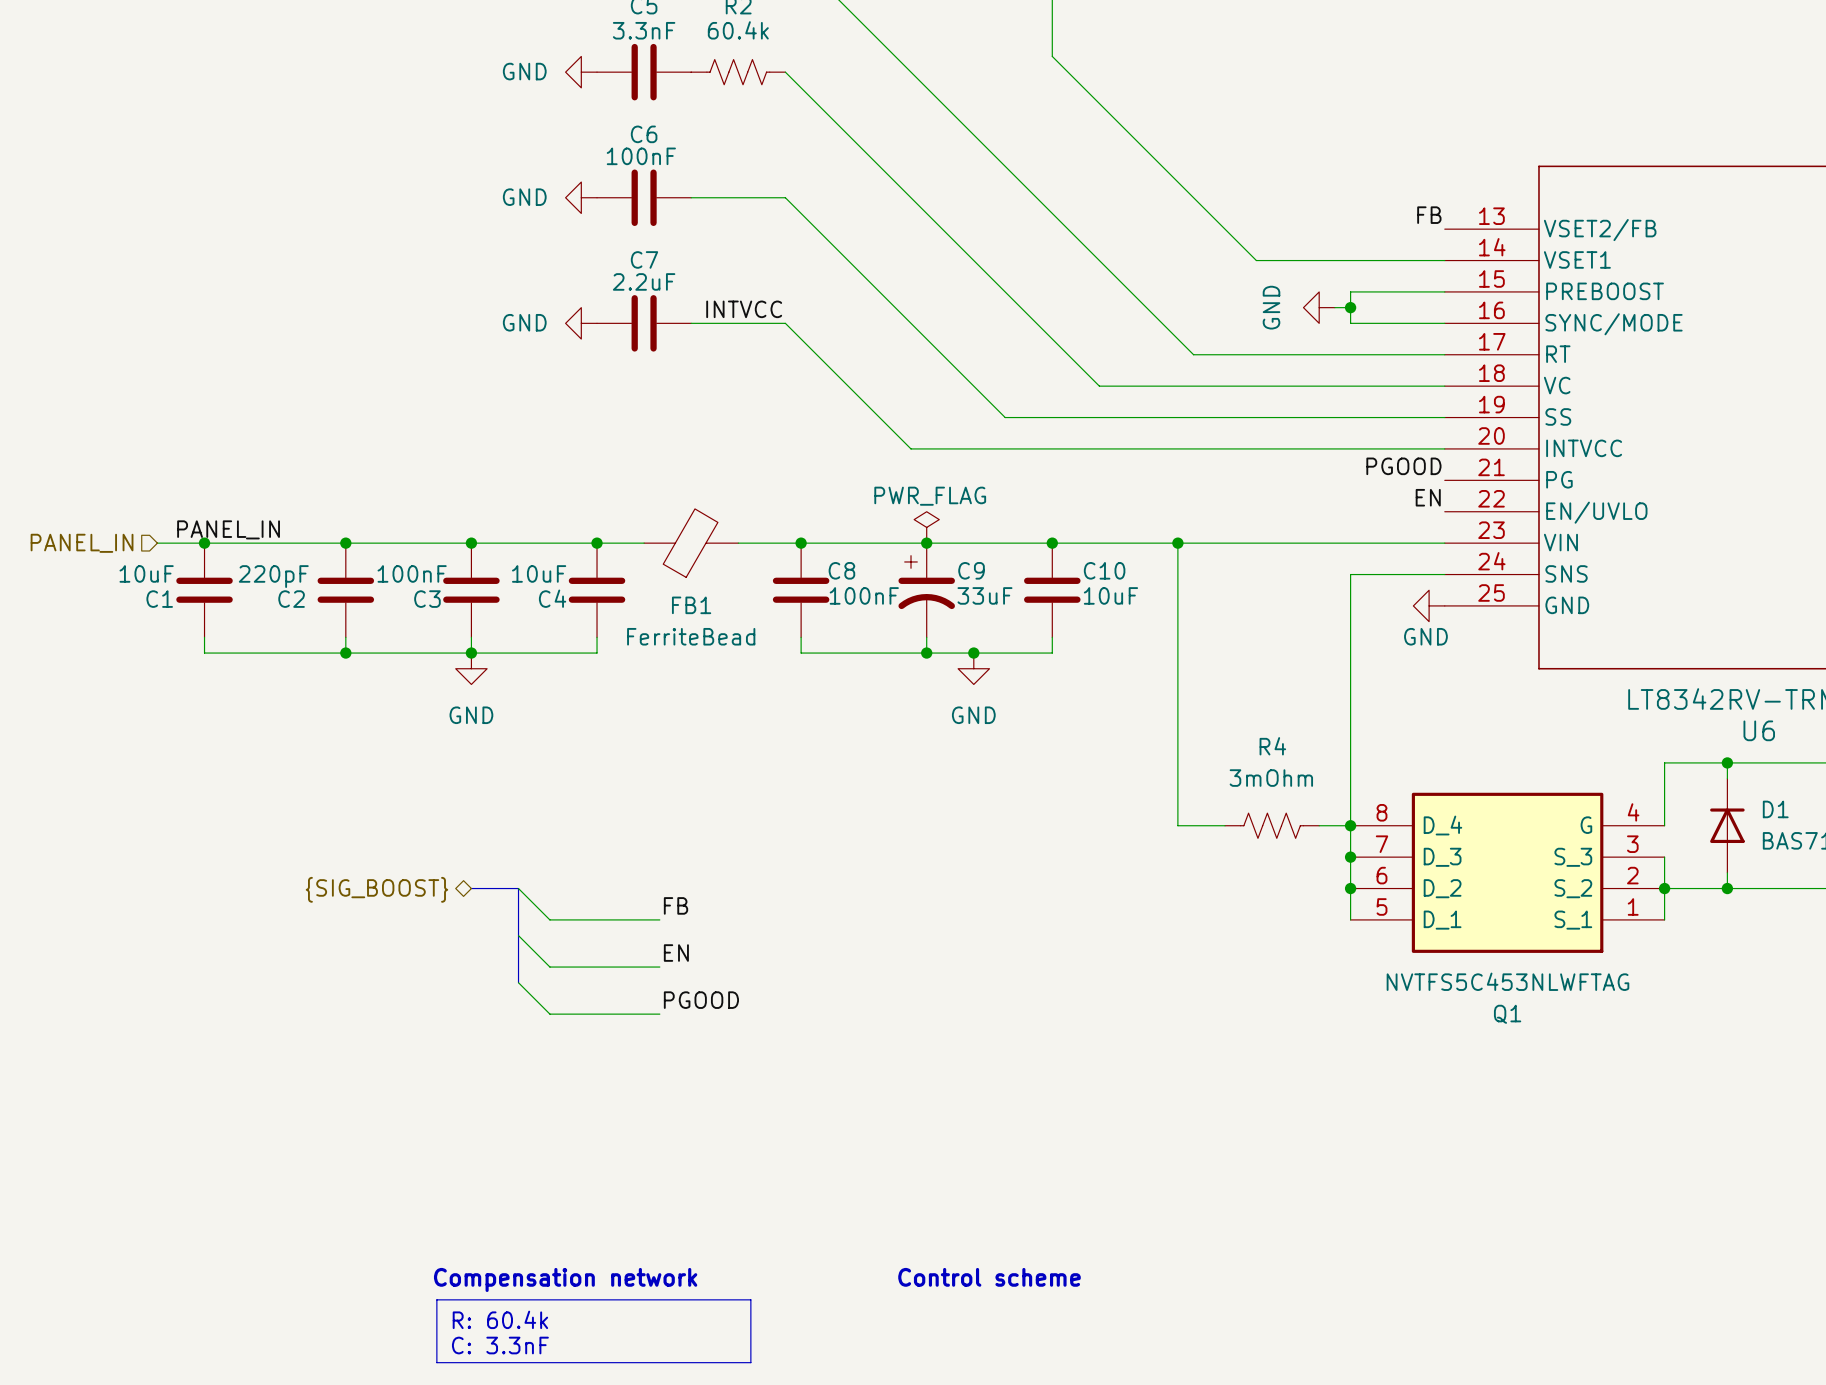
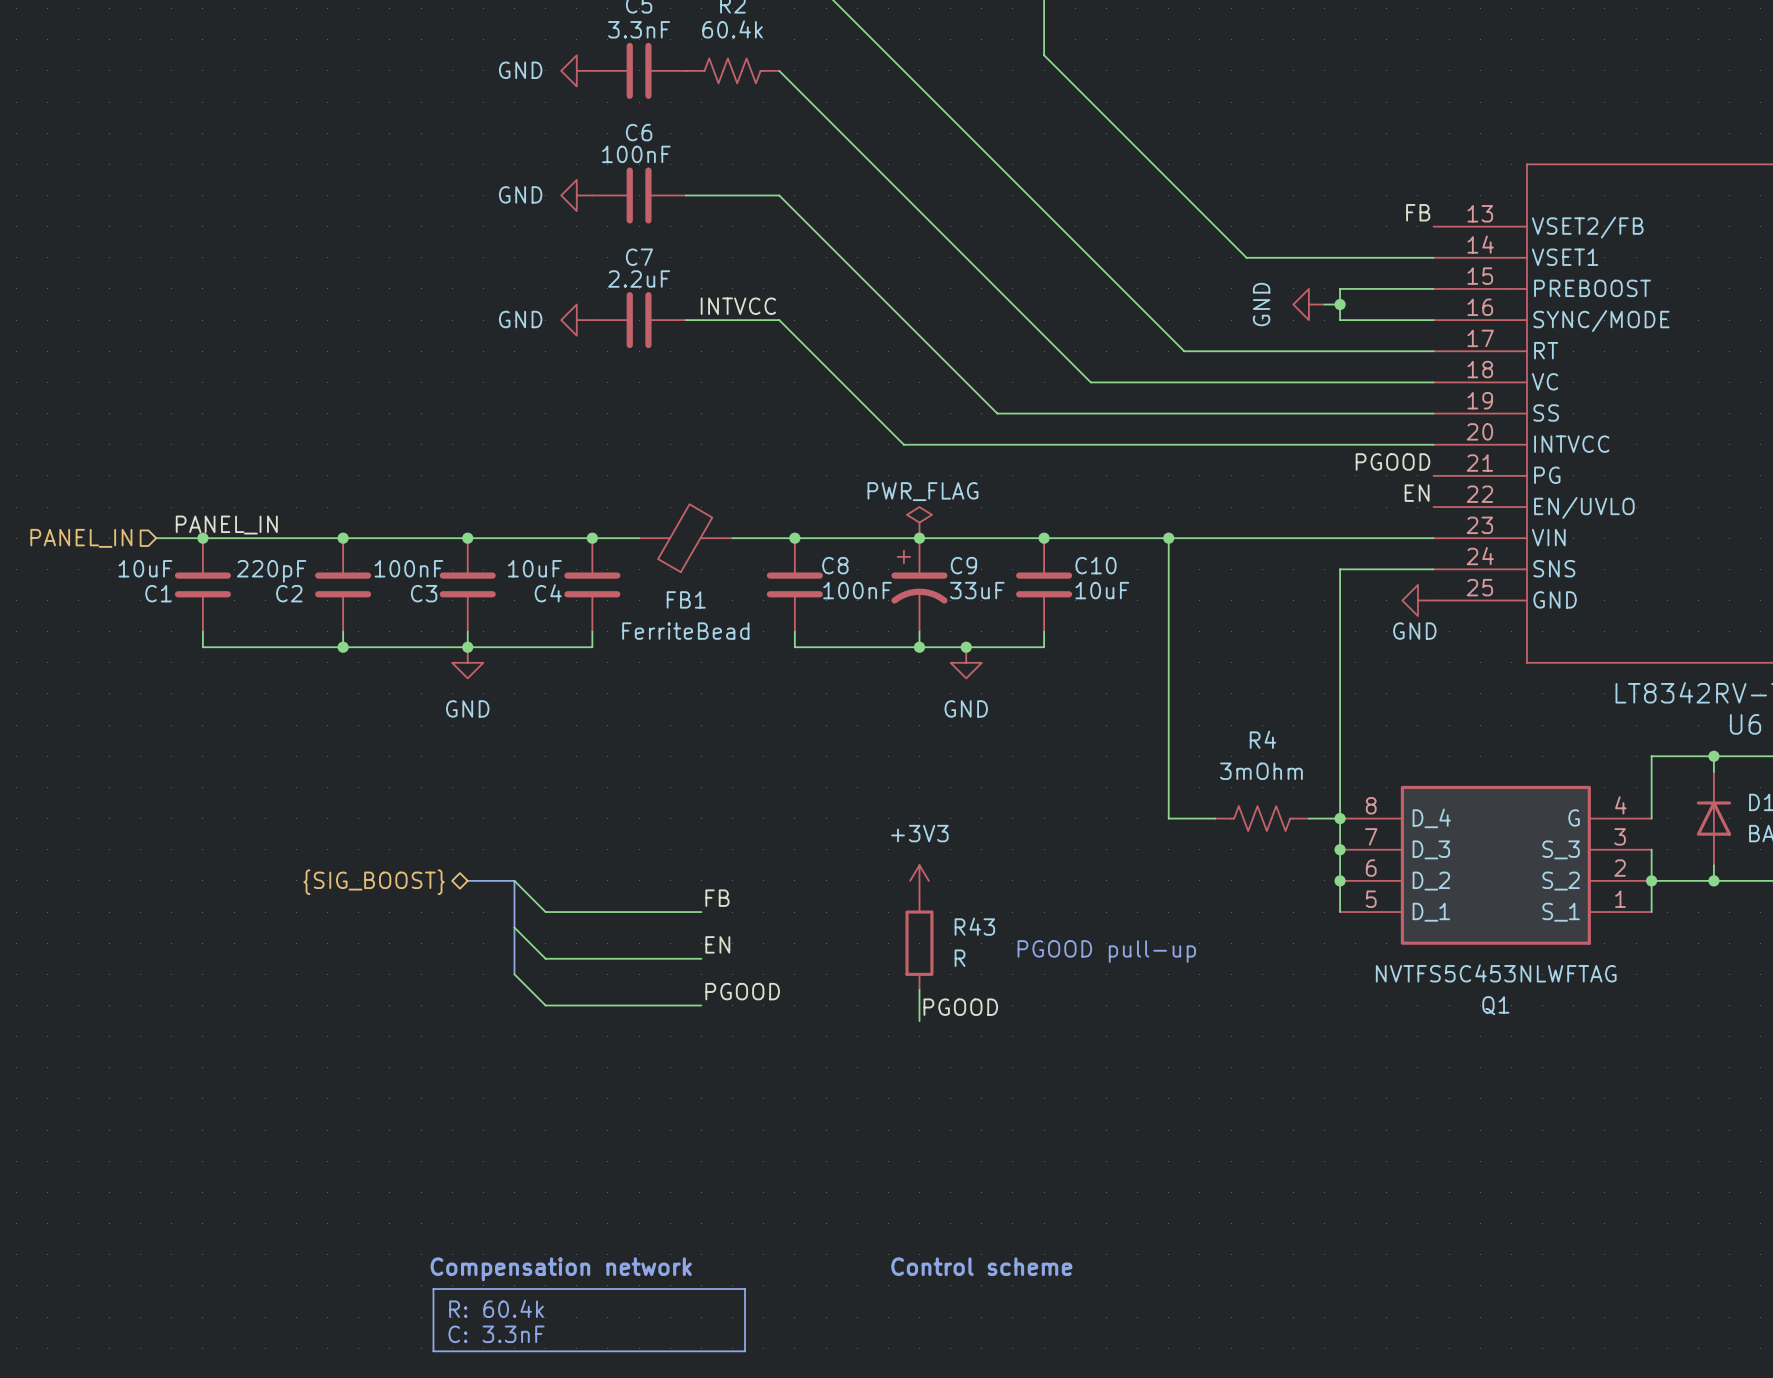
power symbol: none -> +3V3 (919, 880)
label position: FB (676, 905) -> FB (717, 898)
wire: none -> (654, 912) (701, 912)
R43: none -> R (919, 943)
label position: EN (676, 953) -> EN (717, 944)
text: none -> PGOOD pull-up (1106, 951)
wire: none -> (654, 958) (701, 958)
wire: none -> (919, 989) (919, 1021)
label position: PGOOD (701, 1000) -> PGOOD (742, 991)
wire: none -> (654, 1005) (701, 1005)
label: none -> PGOOD (960, 1007)

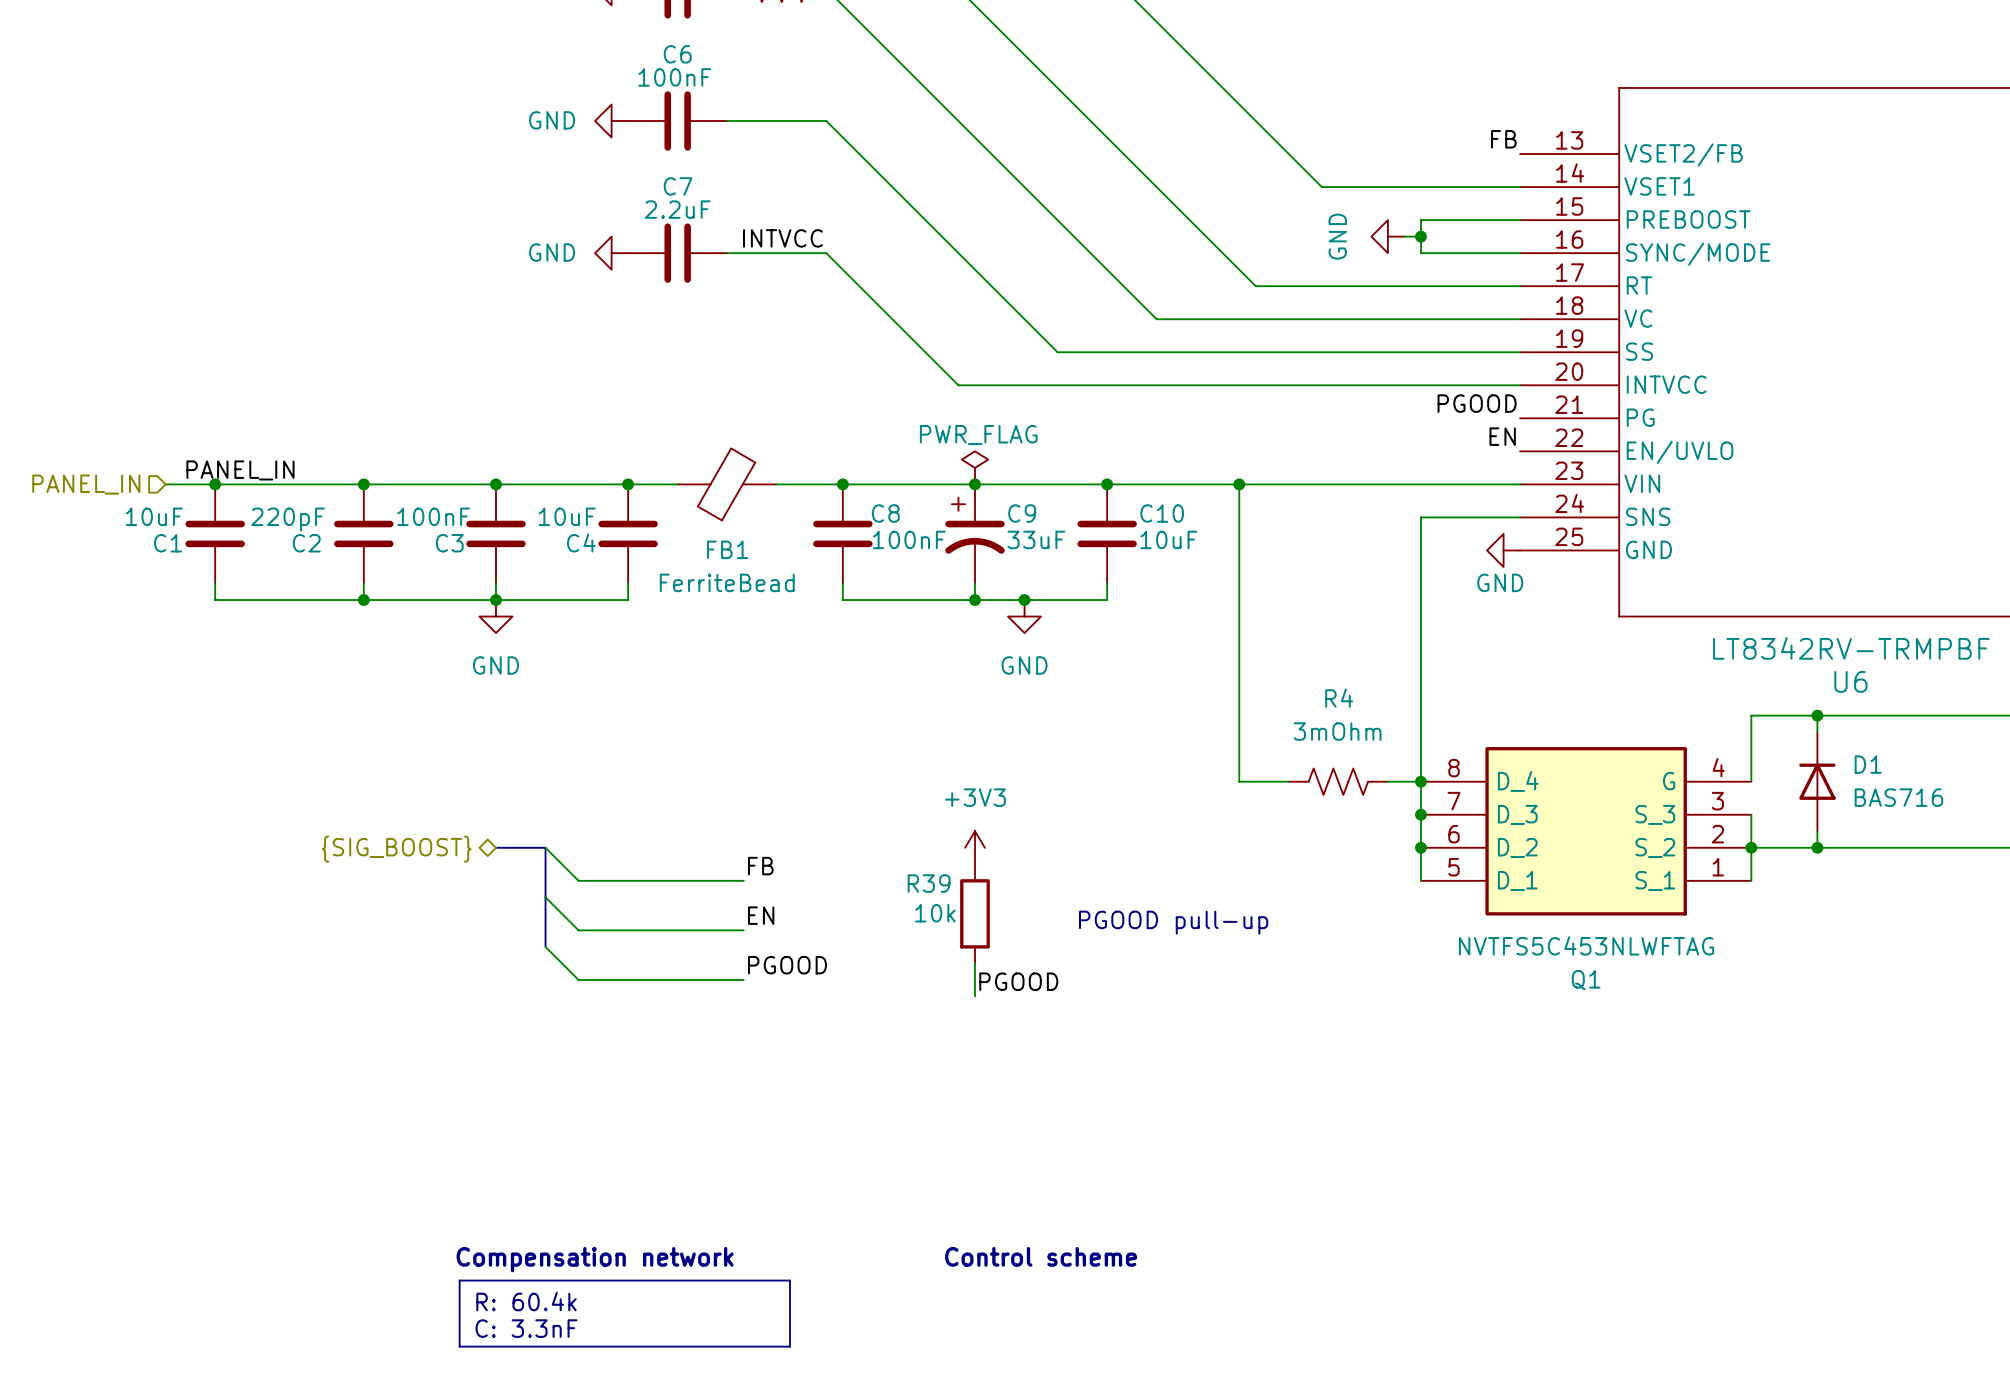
R43 name: R43 (974, 926) -> R39 (929, 883)
R43 value: R (960, 958) -> 10k (935, 913)

